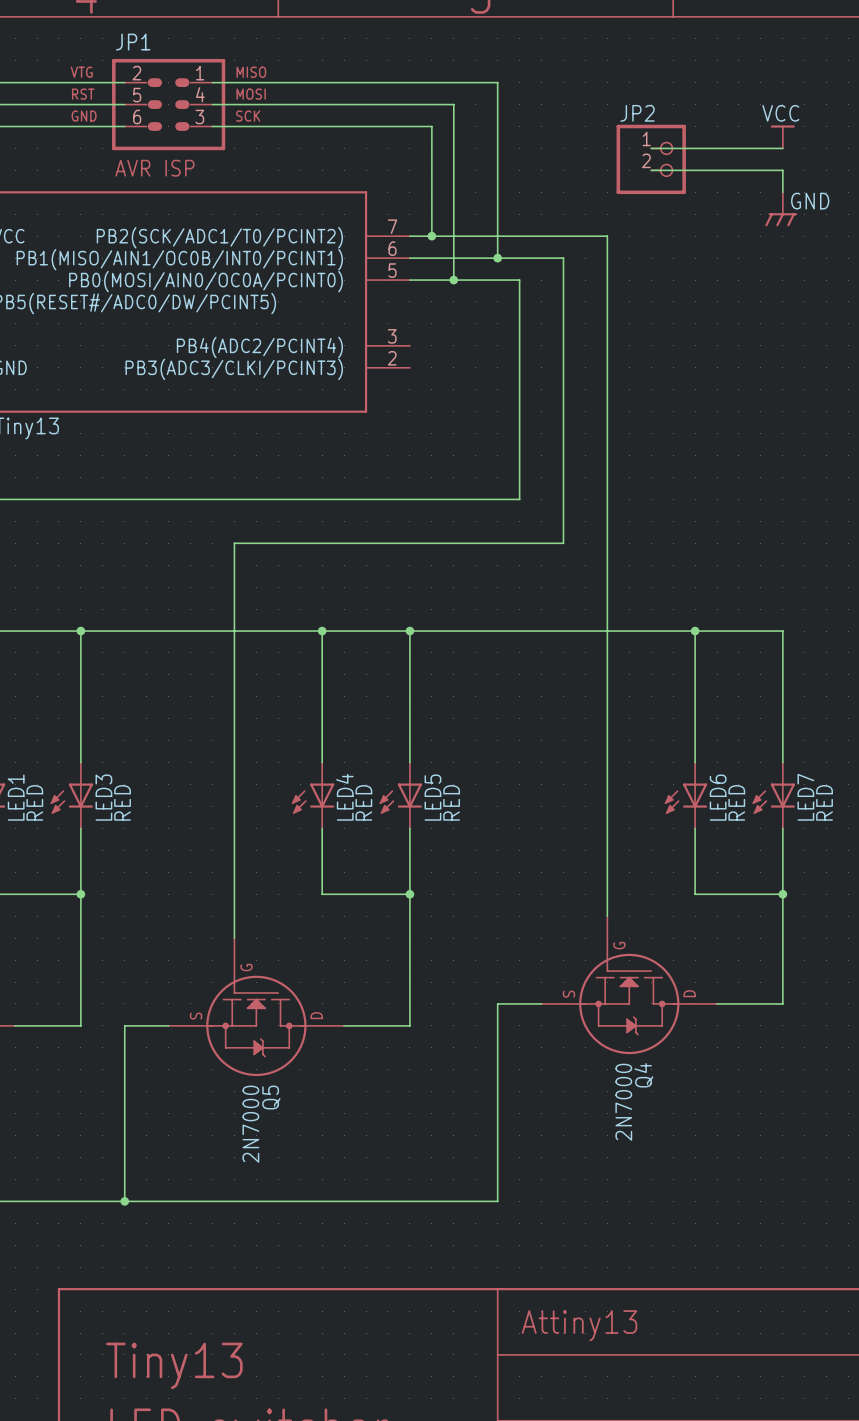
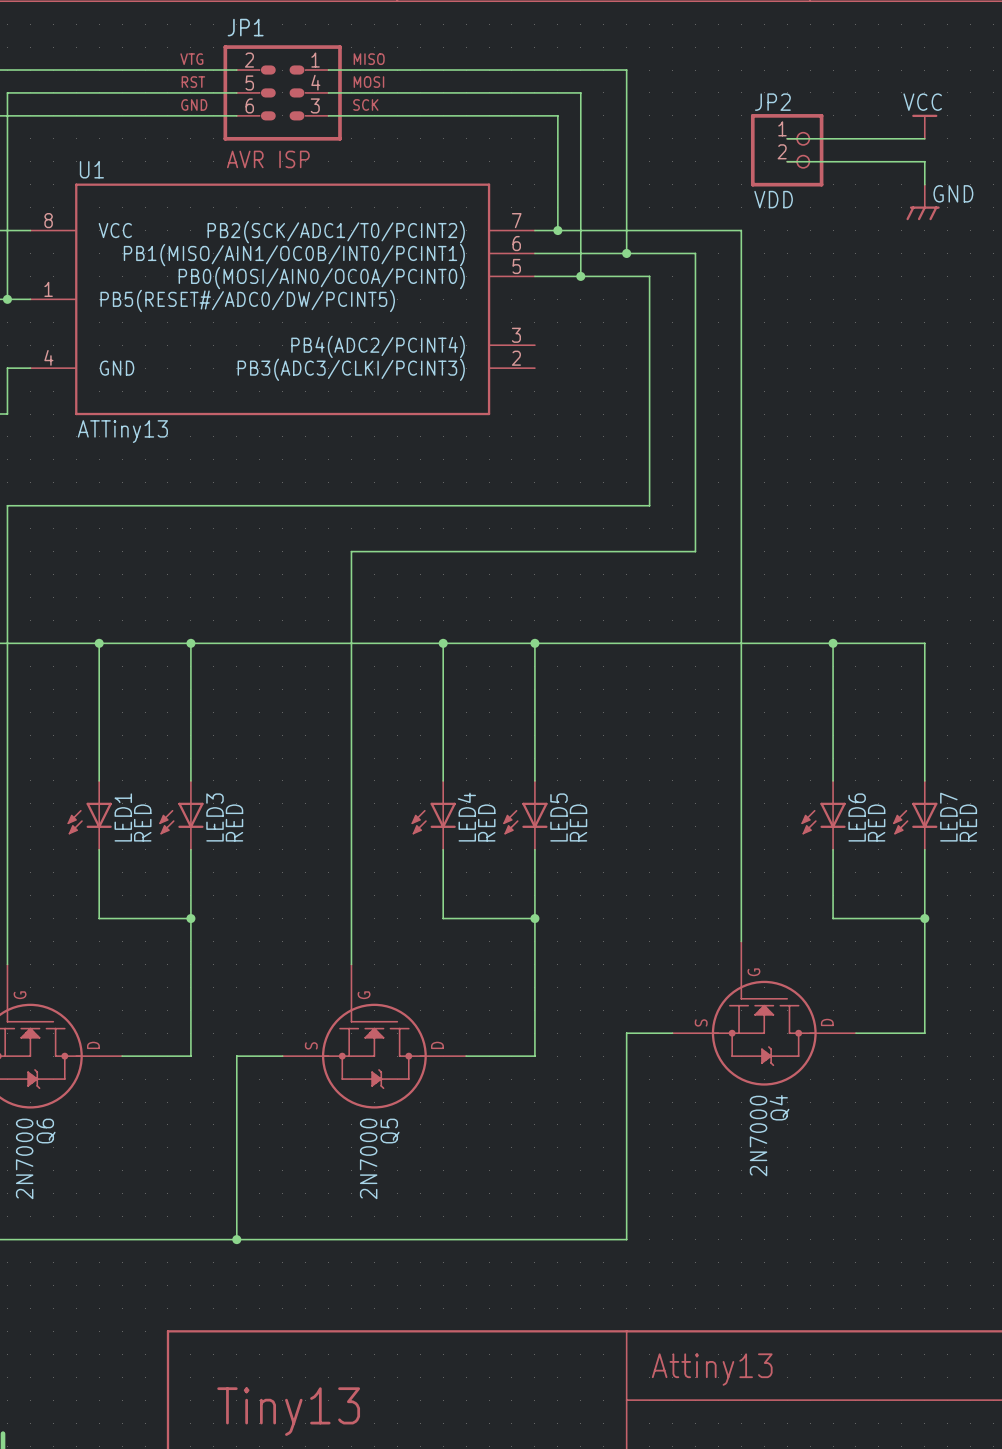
JP2 value: none -> VDD (773, 199)

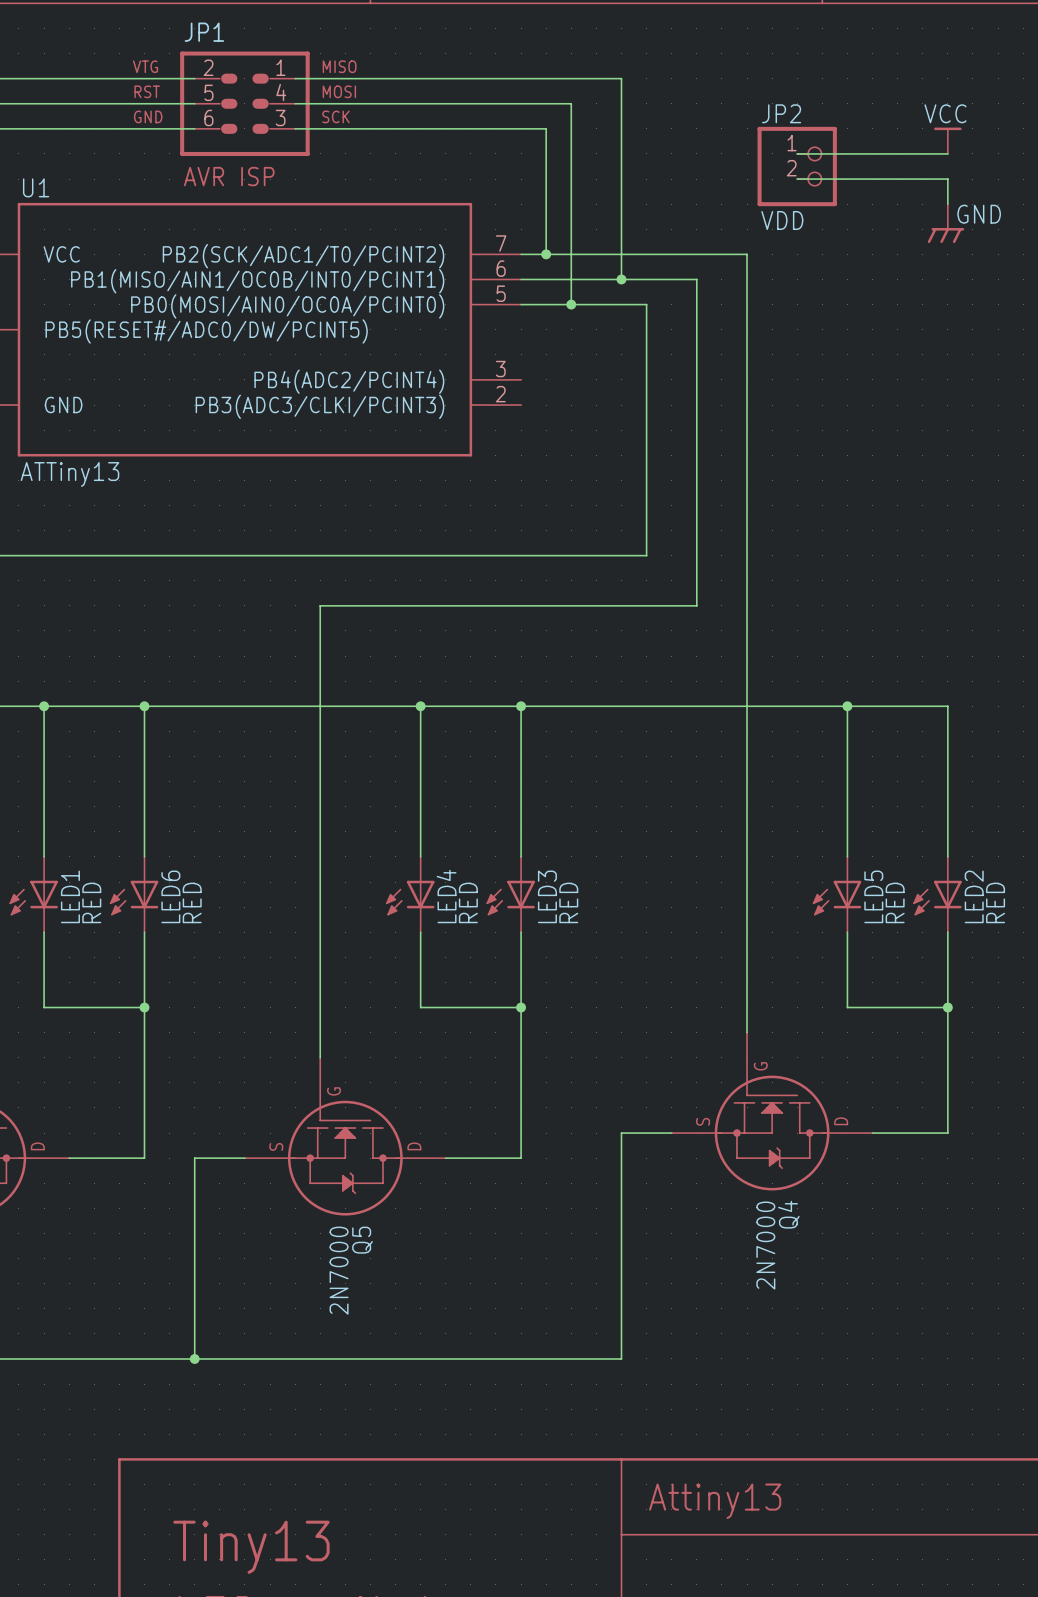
LED3 name: LED3 (215, 817) -> LED6 (170, 896)
LED5 name: LED5 (559, 817) -> LED3 (547, 896)
LED6 name: LED6 (857, 817) -> LED5 (873, 896)
LED7 name: LED7 (948, 817) -> LED2 (974, 896)

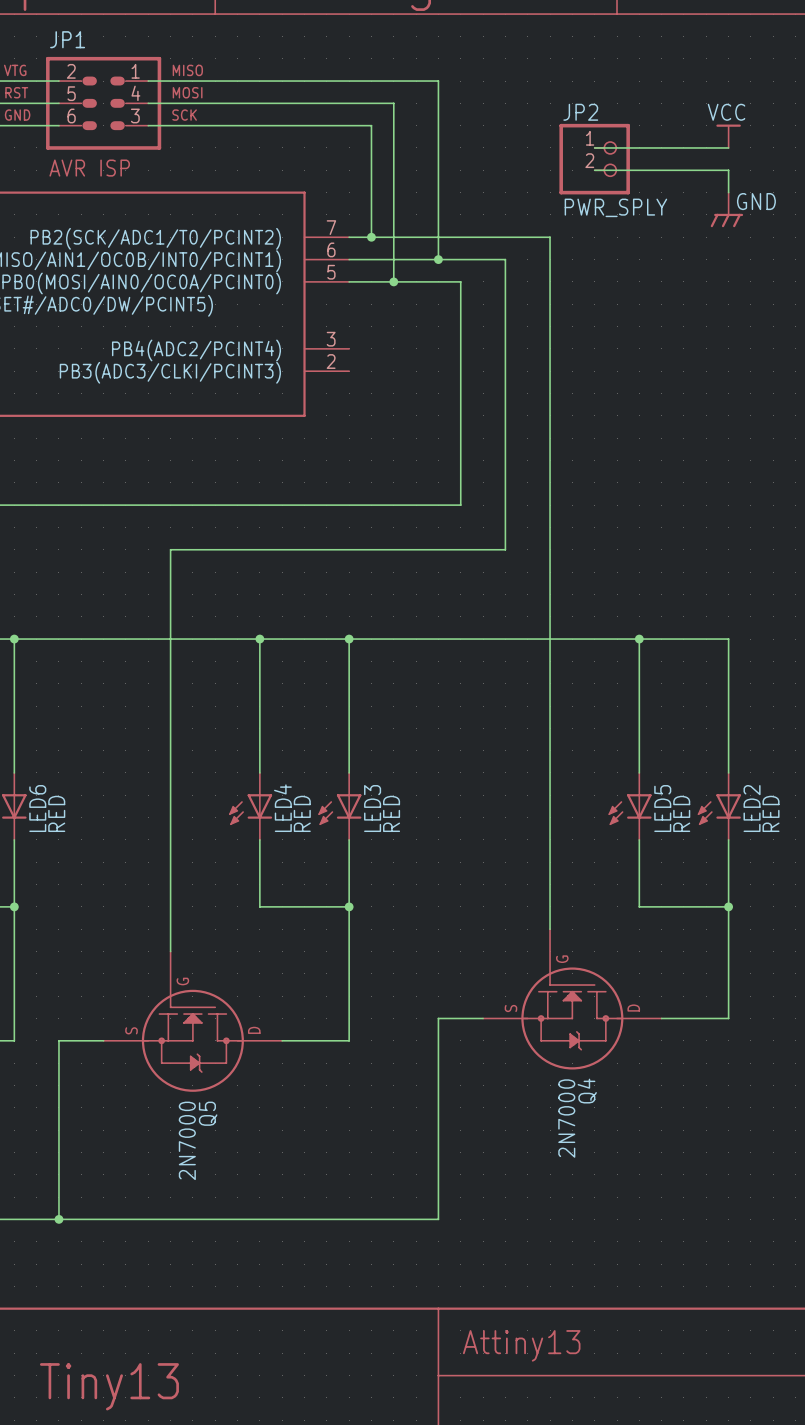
JP2 value: VDD (782, 220) -> PWR_SPLY (615, 207)

